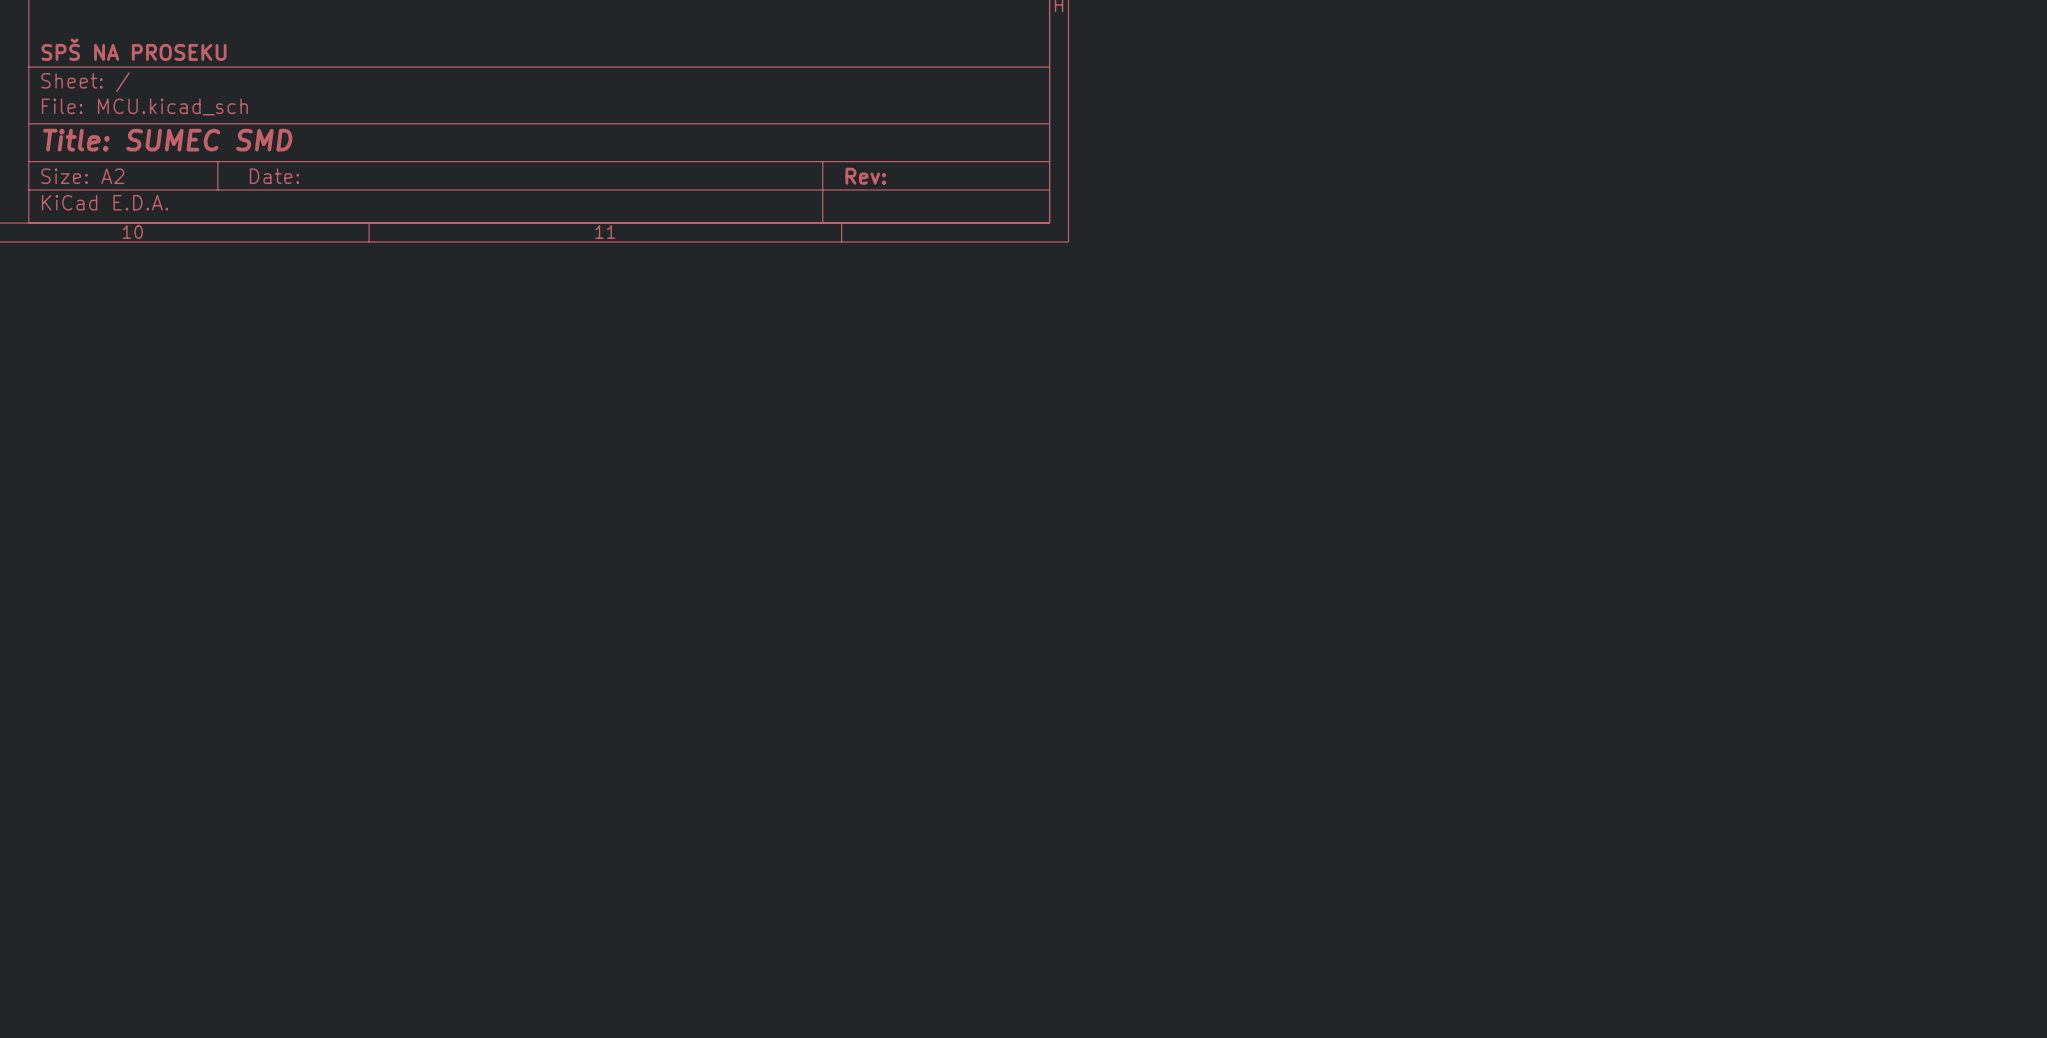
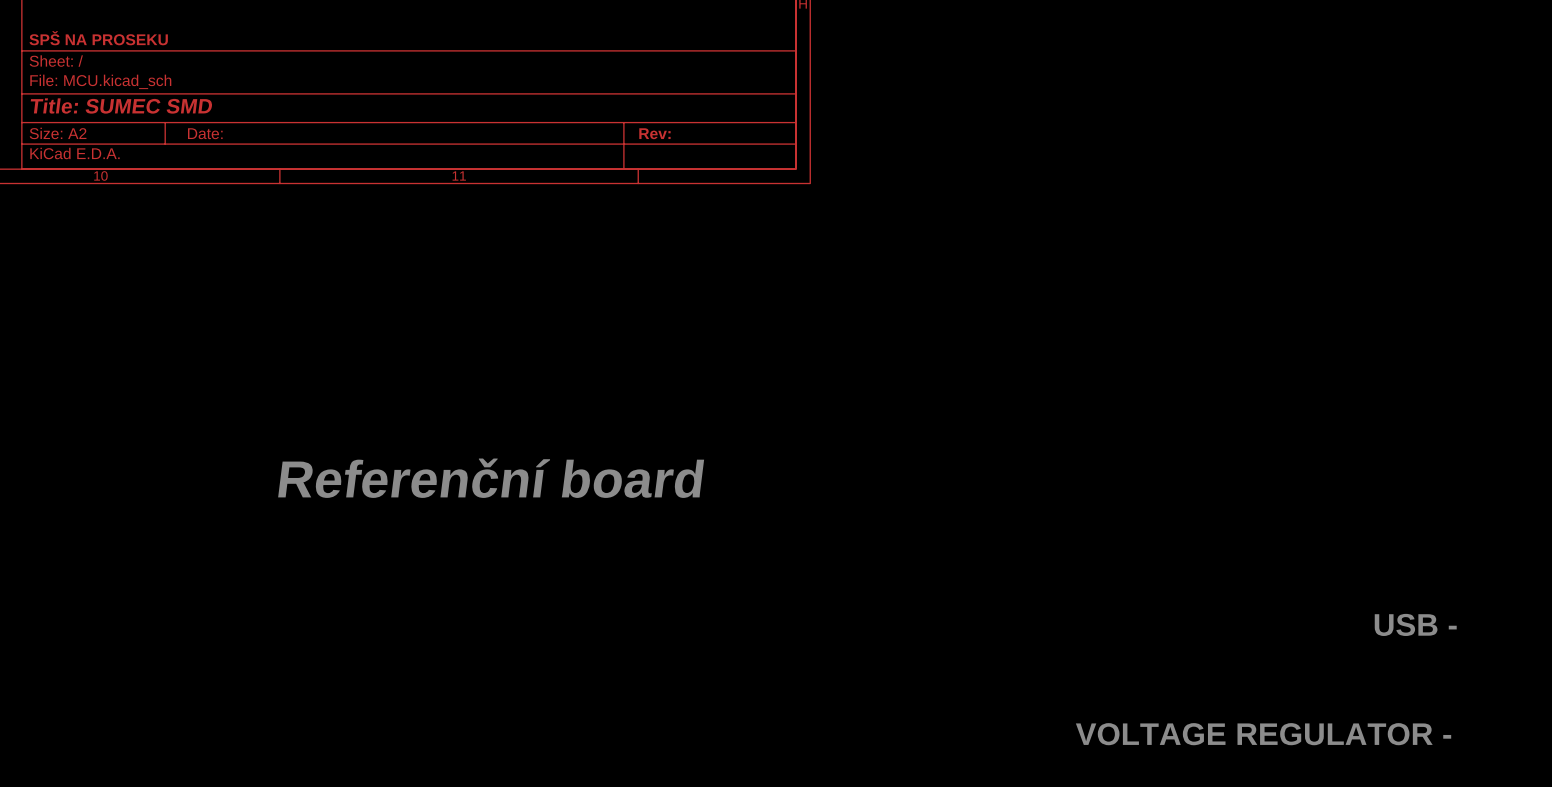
text: none -> Referenční board (491, 478)
text: none -> USB - (1415, 624)
text: none -> VOLTAGE REGULATOR - (1263, 734)

